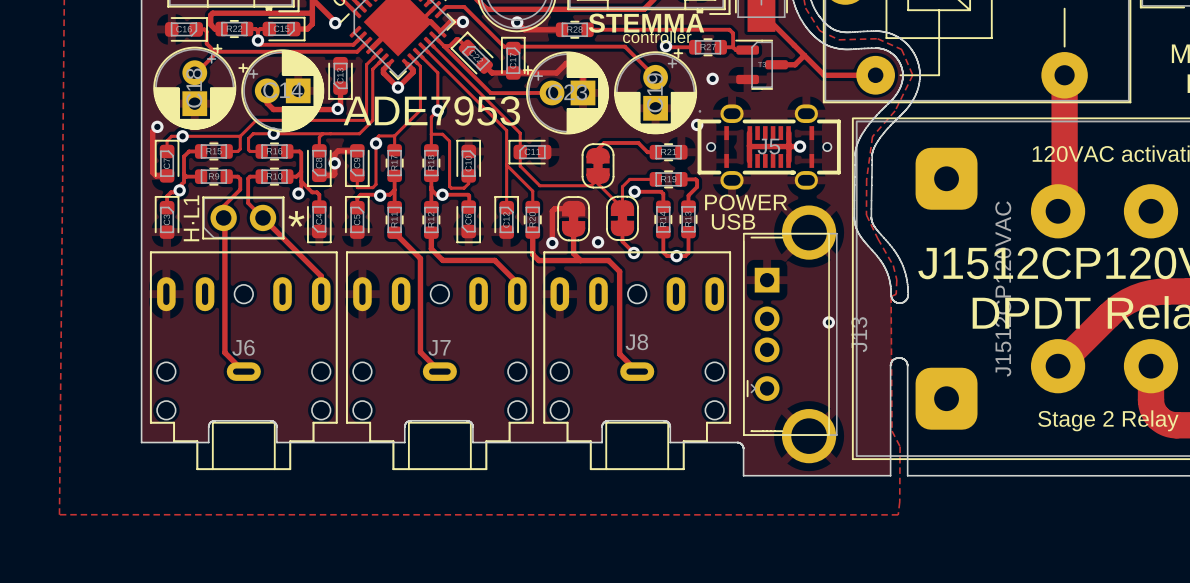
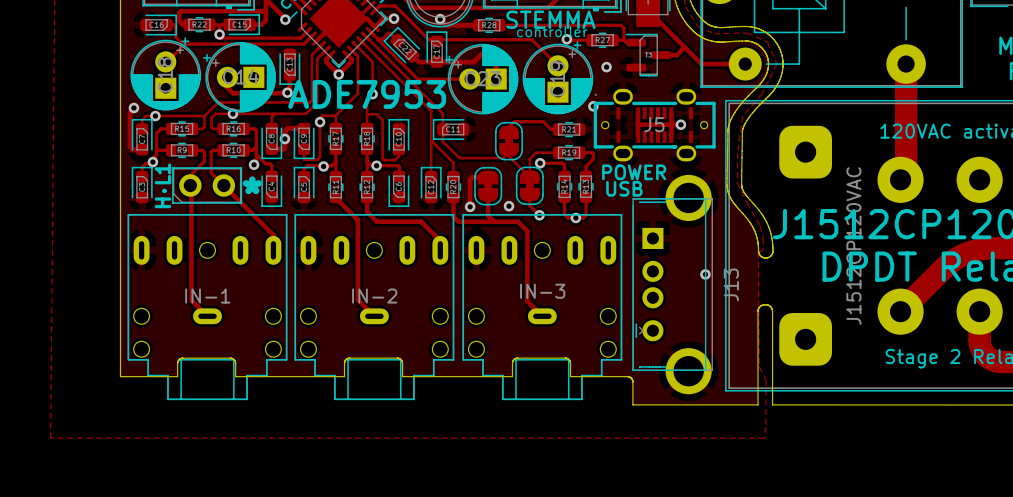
J8 name: J8 (636, 342) -> IN-3 (542, 291)
J6 name: J6 (243, 347) -> IN-1 (207, 296)
J7 name: J7 (439, 347) -> IN-2 (374, 296)

